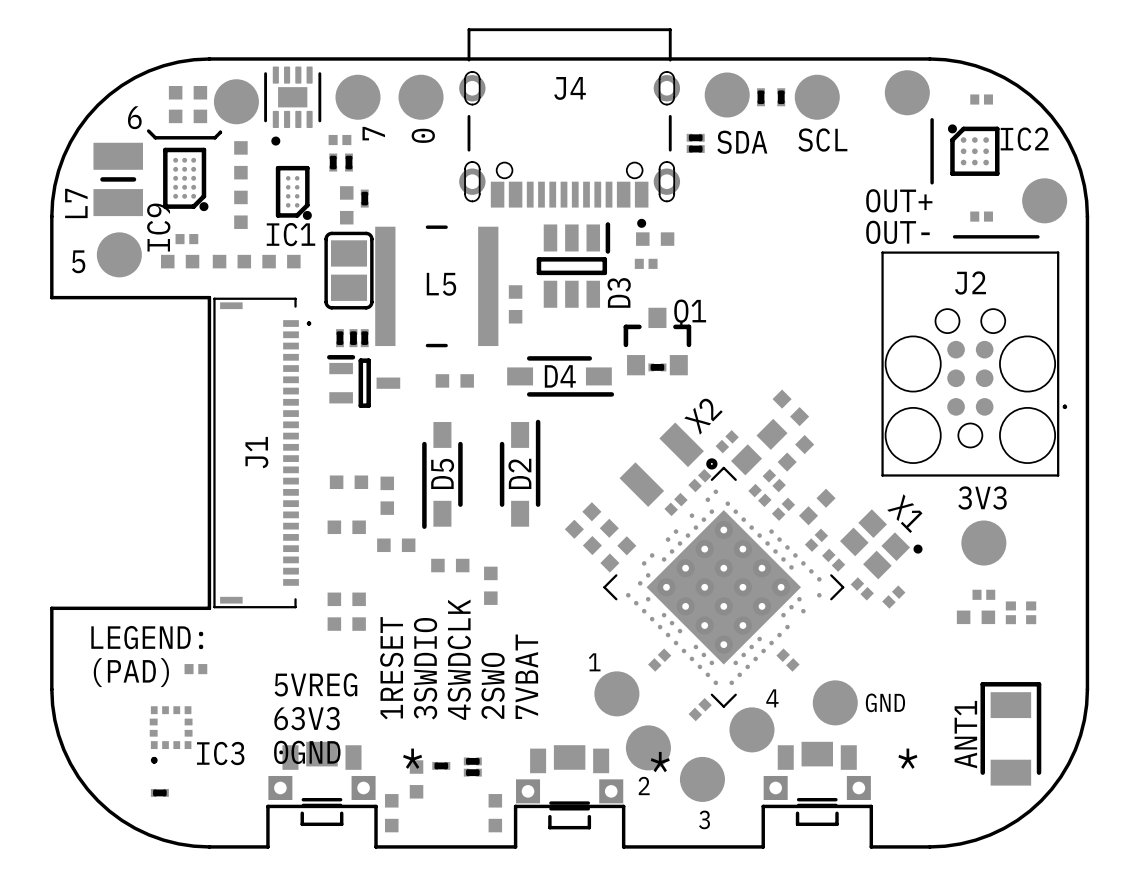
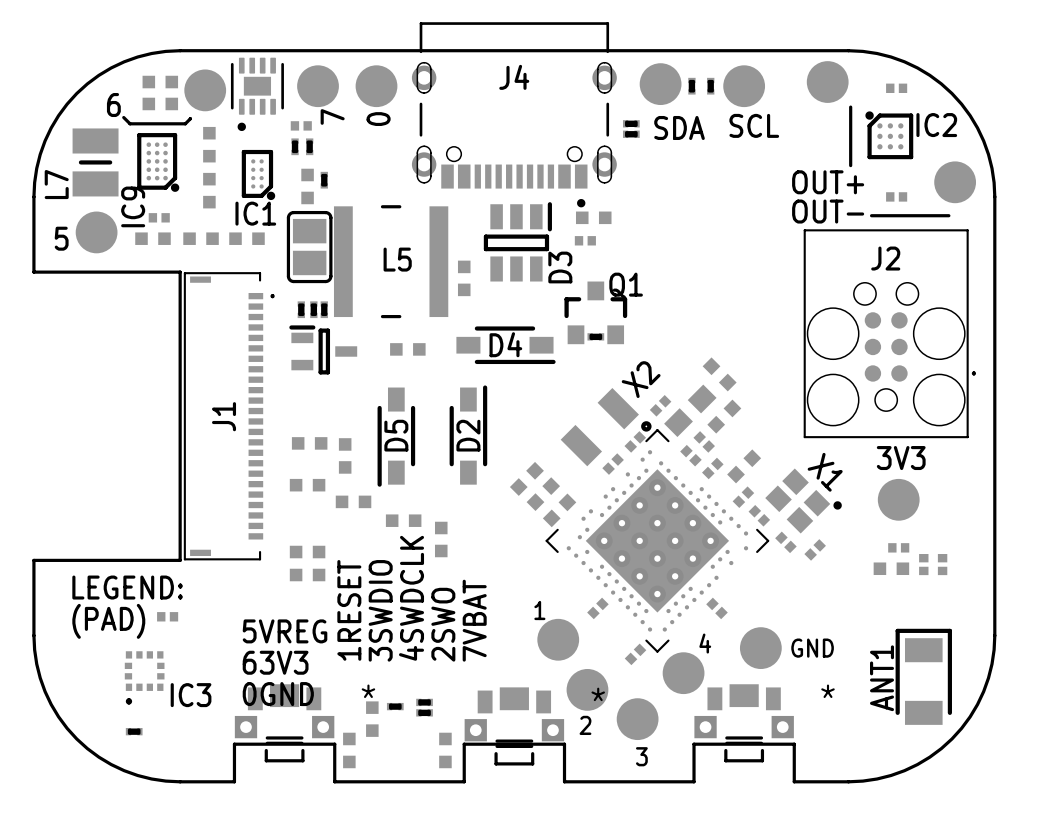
part footprint: [603, 458, 845, 708] -> [545, 421, 770, 653]

